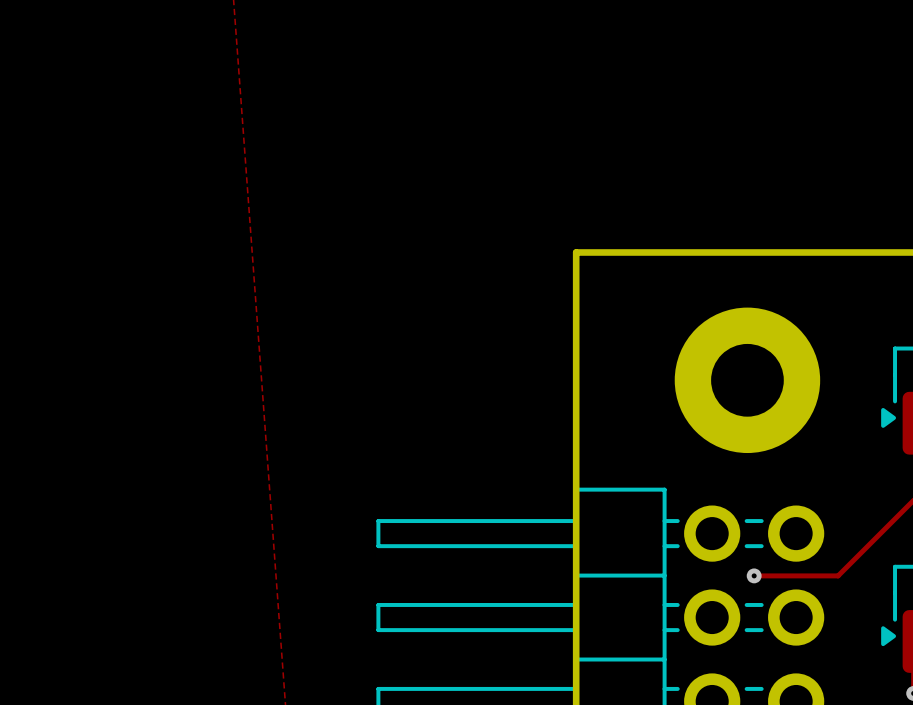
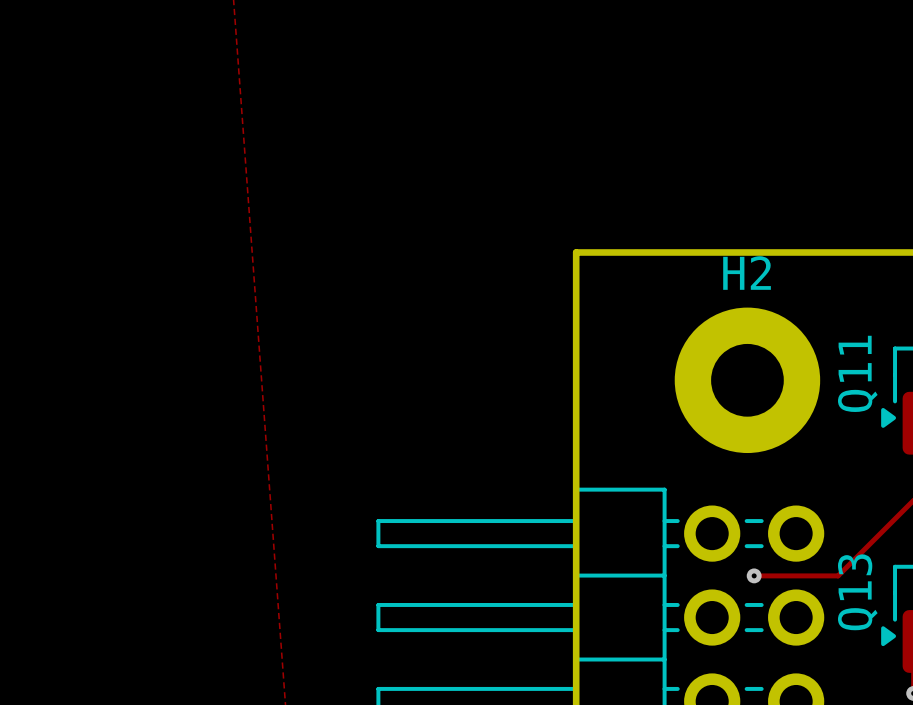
H2 name: none -> H2 (747, 273)
Q11 name: none -> Q11 (857, 373)
Q13 name: none -> Q13 (857, 592)

